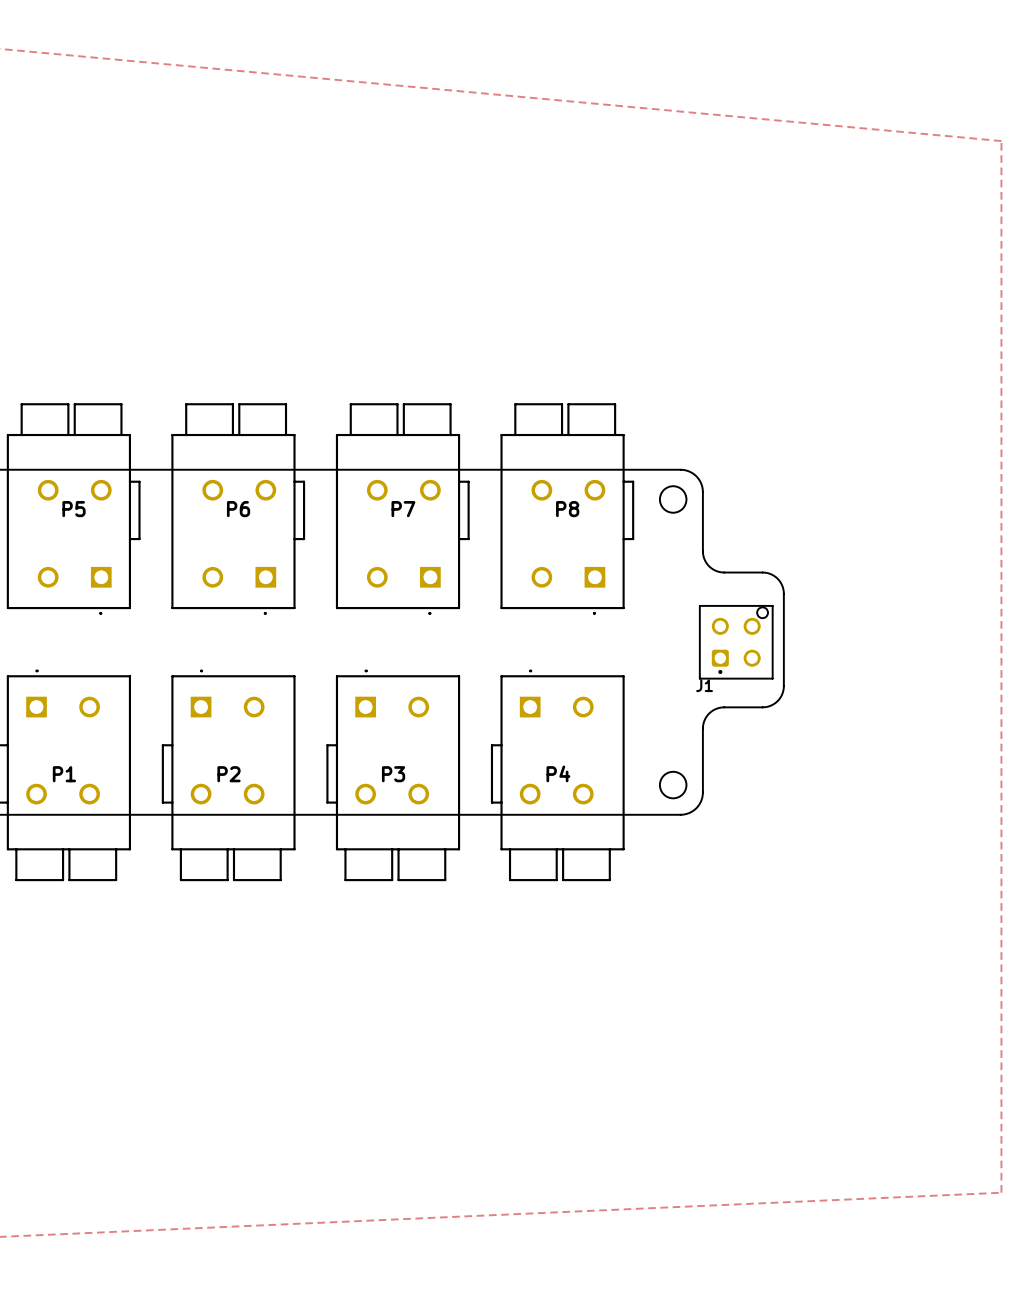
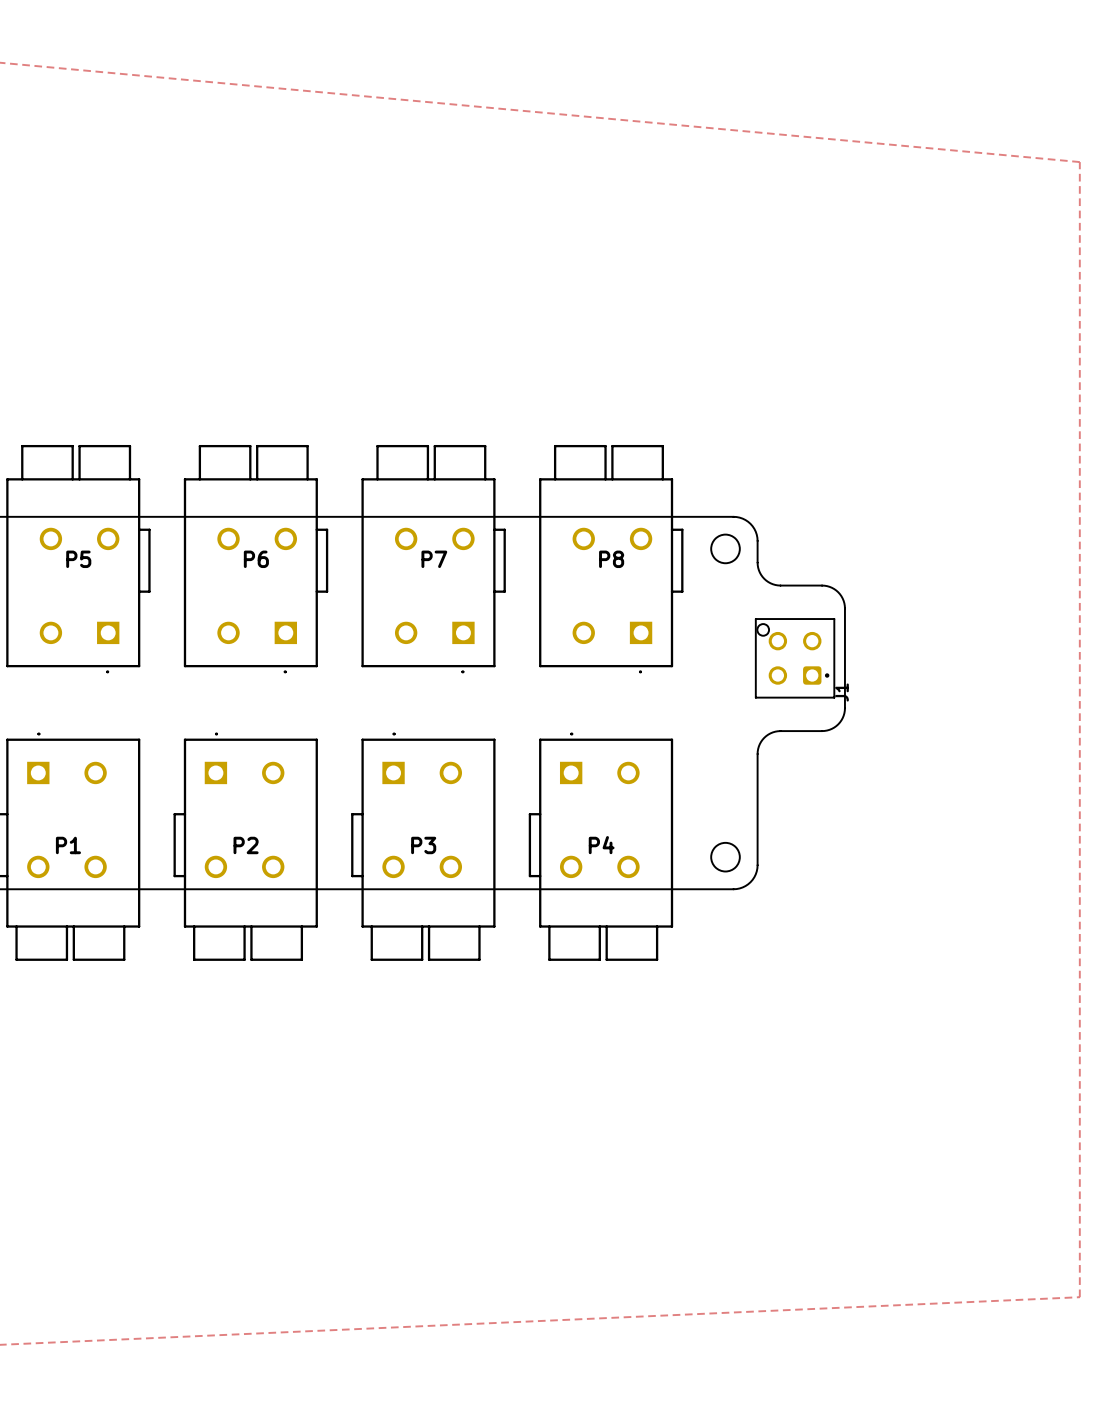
board edge: (702, 512) (703, 553) (709, 566) (721, 572) (769, 573) (780, 582) (783, 593) -> (757, 562) (762, 576) (772, 584) (824, 585) (838, 592) (844, 605) (844, 650)
J1 rotation: 0° (736, 642) -> 90° counterclockwise (795, 658)
board edge: (783, 647) (783, 688) (777, 701) (765, 707) (717, 708) (706, 717) (702, 728) -> (844, 708) (841, 720) (829, 729) (777, 731) (764, 737) (757, 751) (757, 796)

